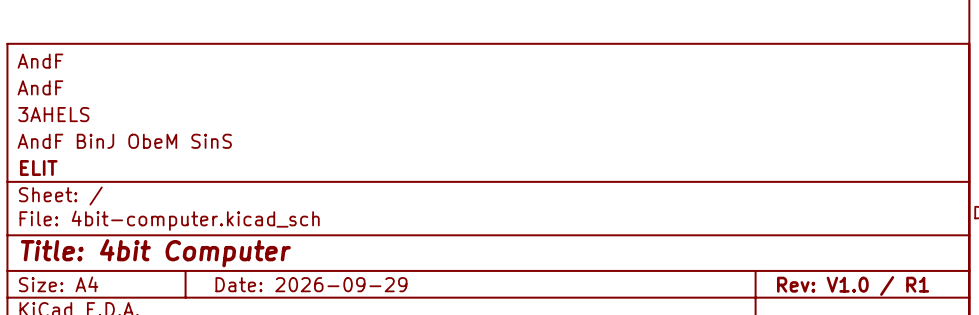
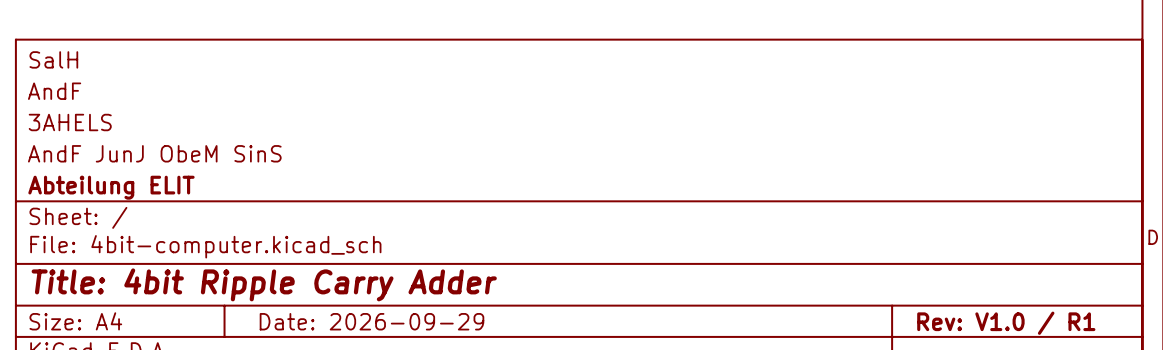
title block: AndF (40, 61) -> SalH (53, 59)
title block: AndF BinJ ObeM SinS (124, 141) -> AndF JunJ ObeM SinS (154, 153)
title block: ELIT (38, 168) -> Abteilung ELIT (111, 187)
title block: Title: 4bit Computer (155, 253) -> Title: 4bit Ripple Carry Adder (264, 284)

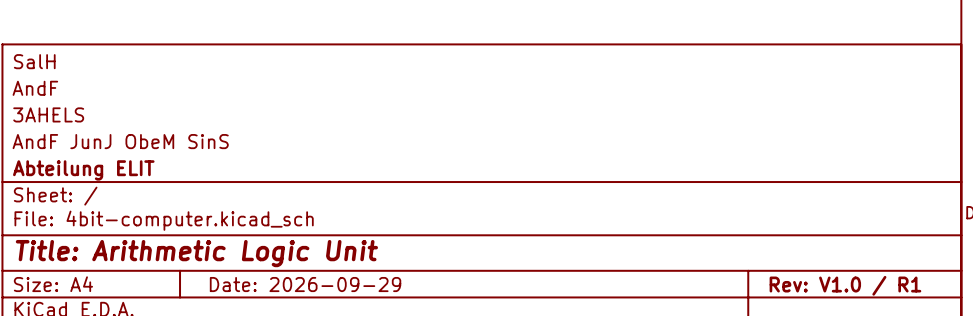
title block: Title: 4bit Ripple Carry Adder (264, 284) -> Title: Arithmetic Logic Unit (196, 253)

